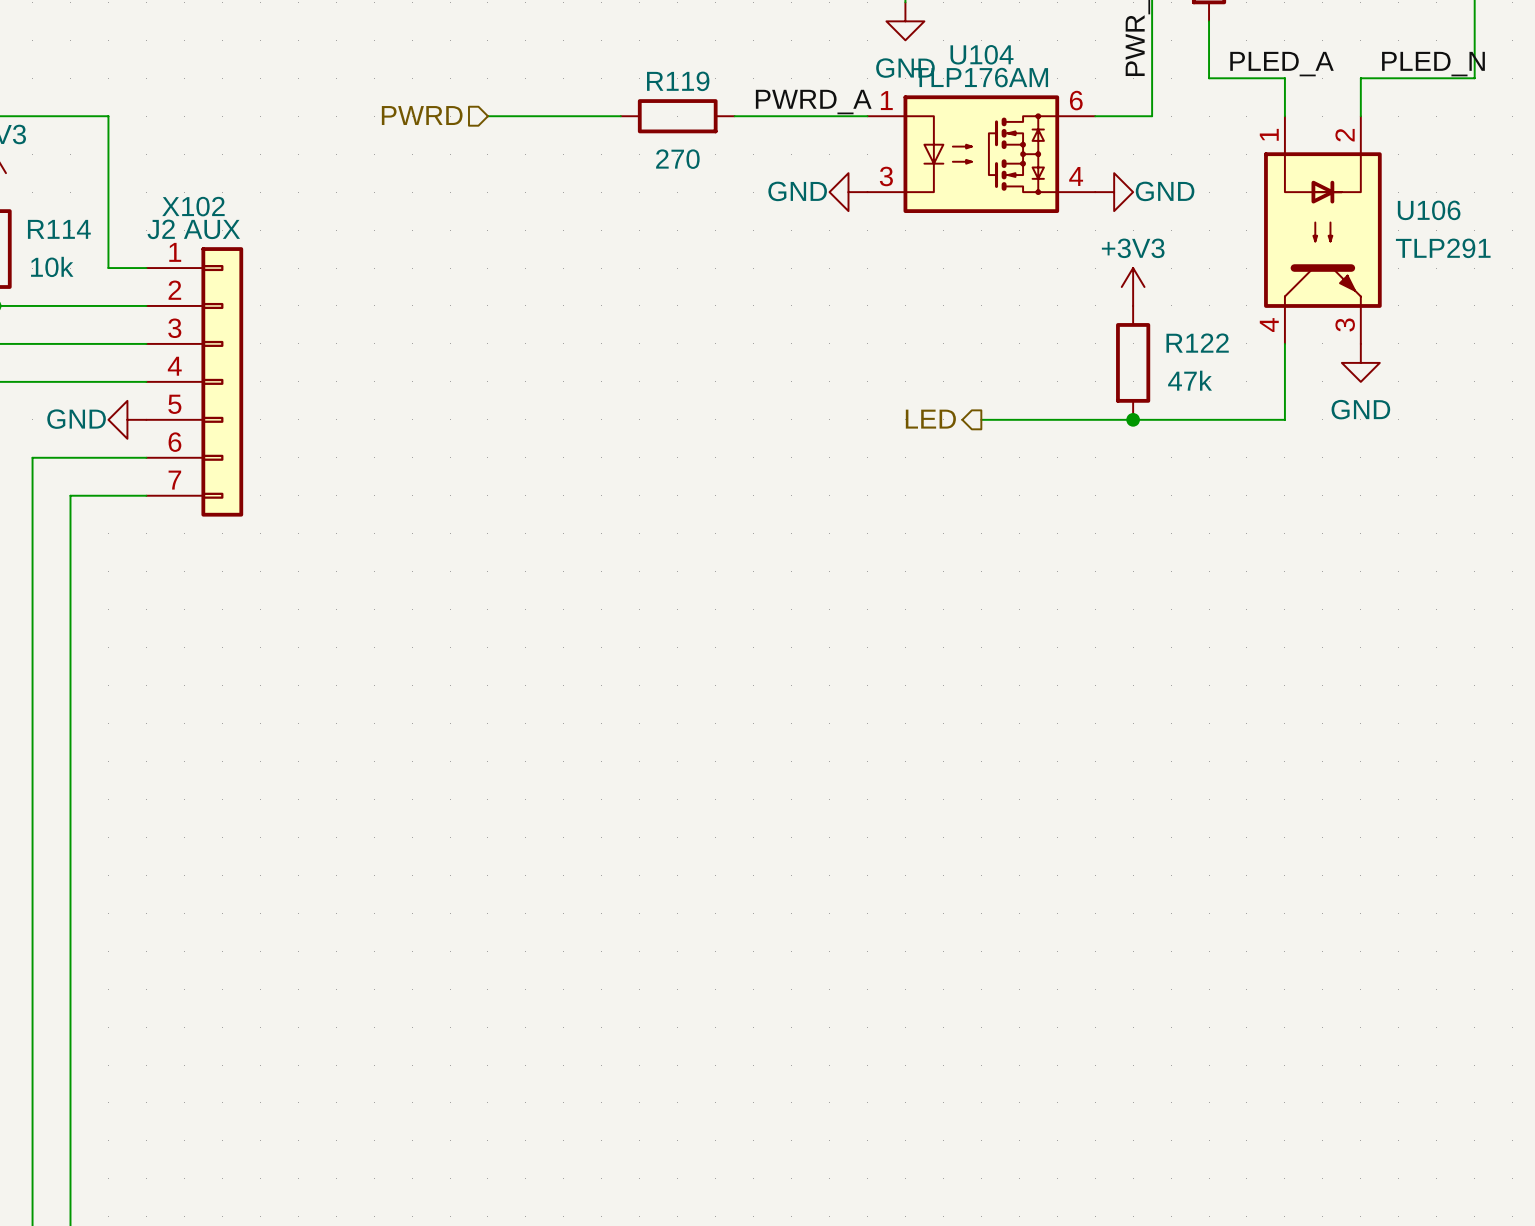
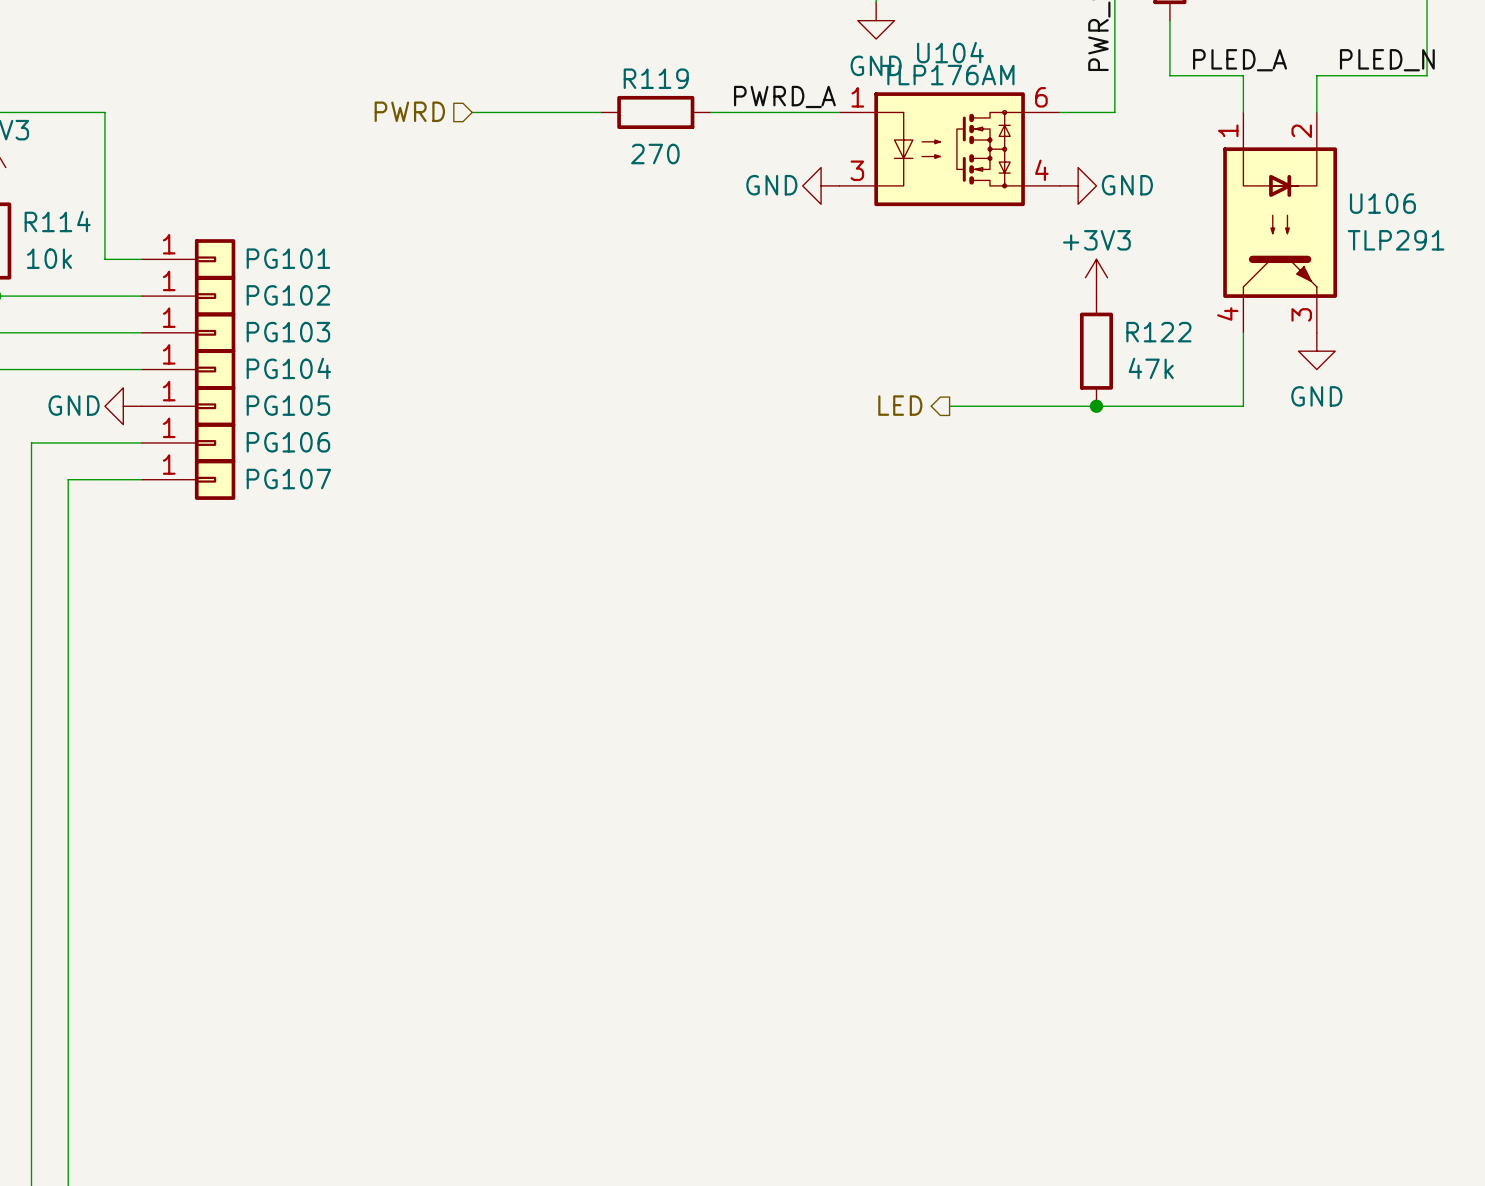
PG101: none -> (188, 259)
PG102: none -> (188, 296)
PG103: none -> (188, 332)
X102: J2 AUX (194, 381) -> none
PG104: none -> (188, 369)
PG105: none -> (188, 406)
PG106: none -> (188, 442)
PG107: none -> (188, 479)

